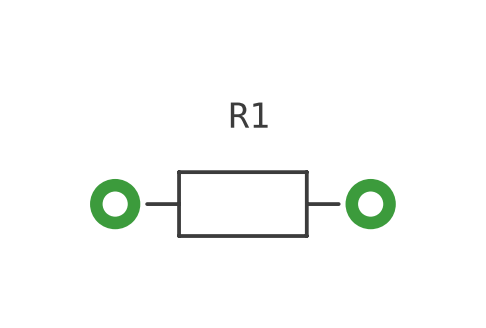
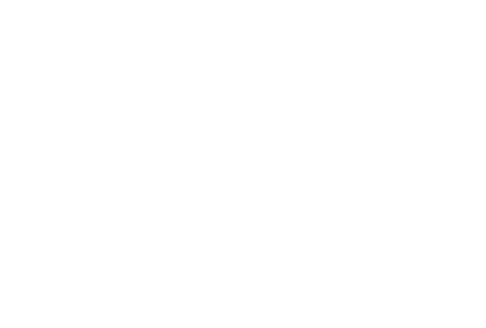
R1: (242, 204) -> none

